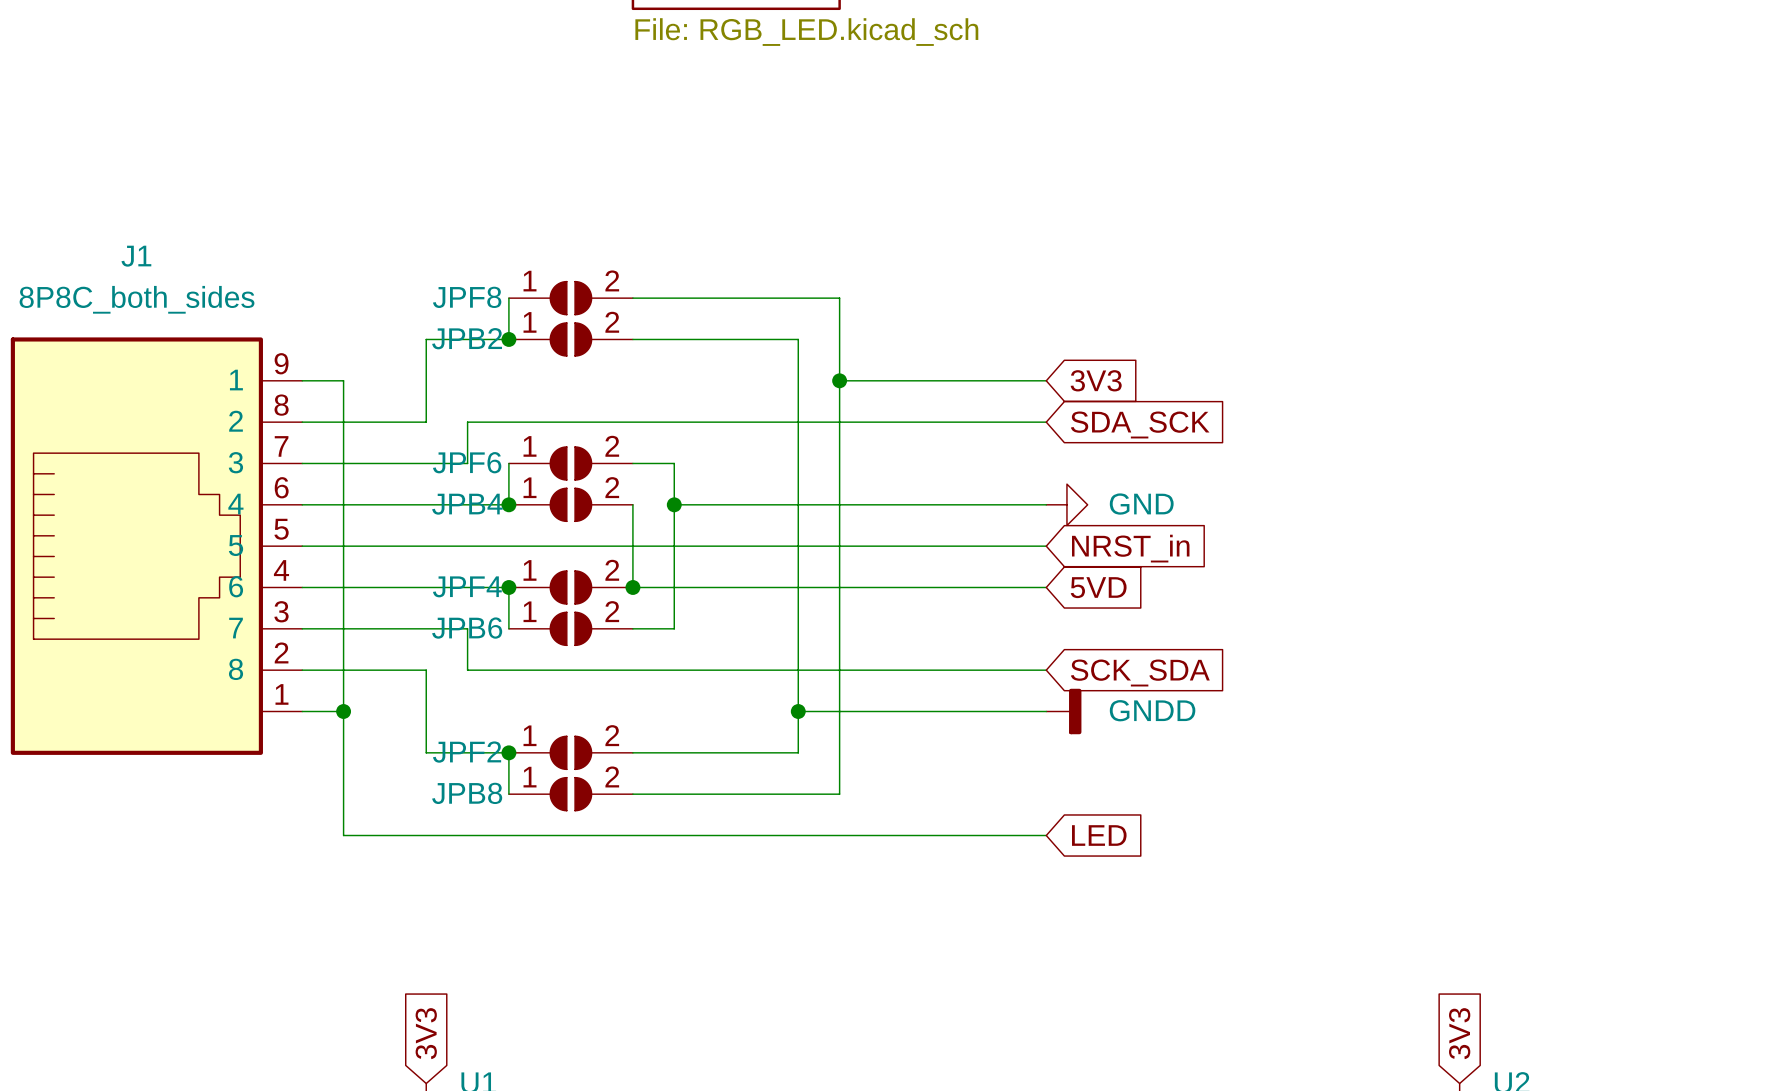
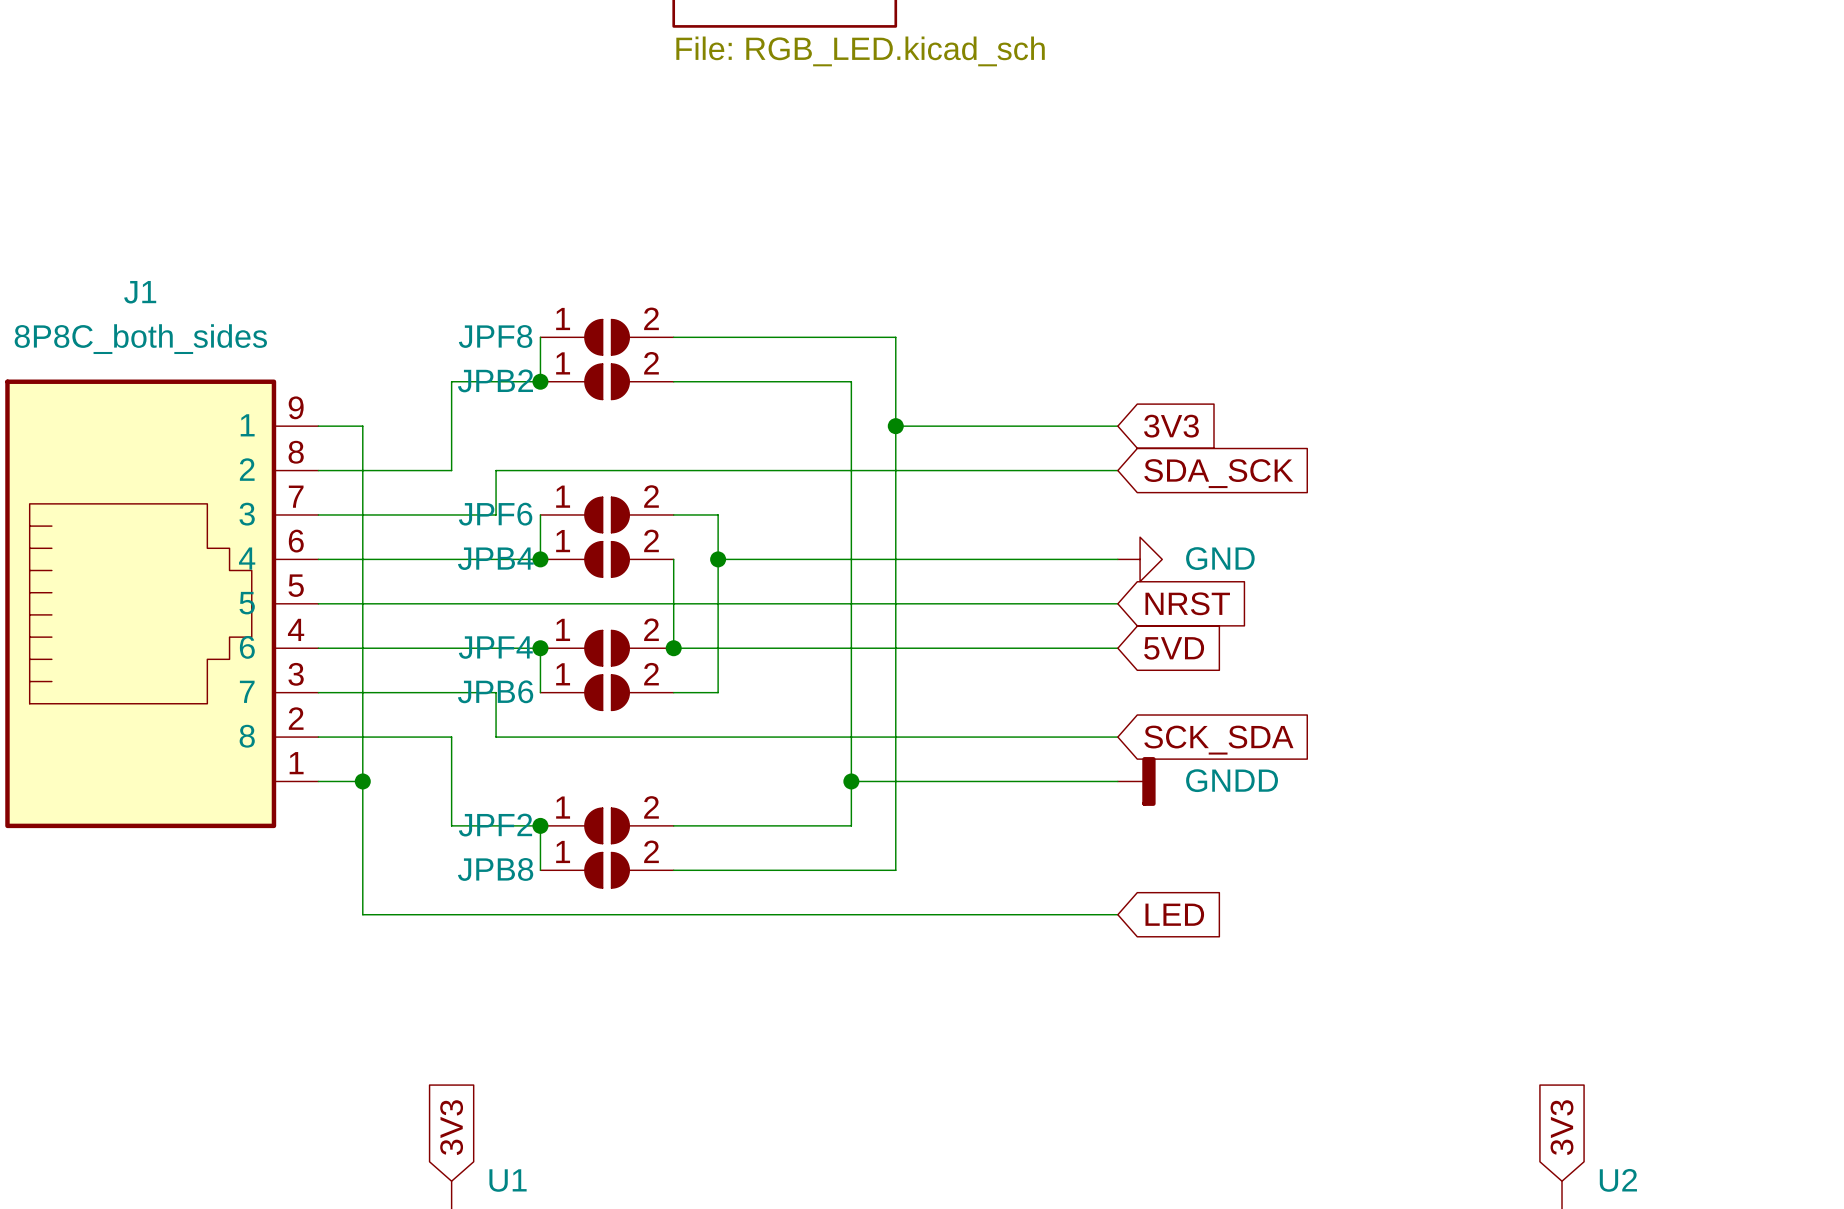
global label: NRST_in (1130, 548) -> NRST (1187, 603)

